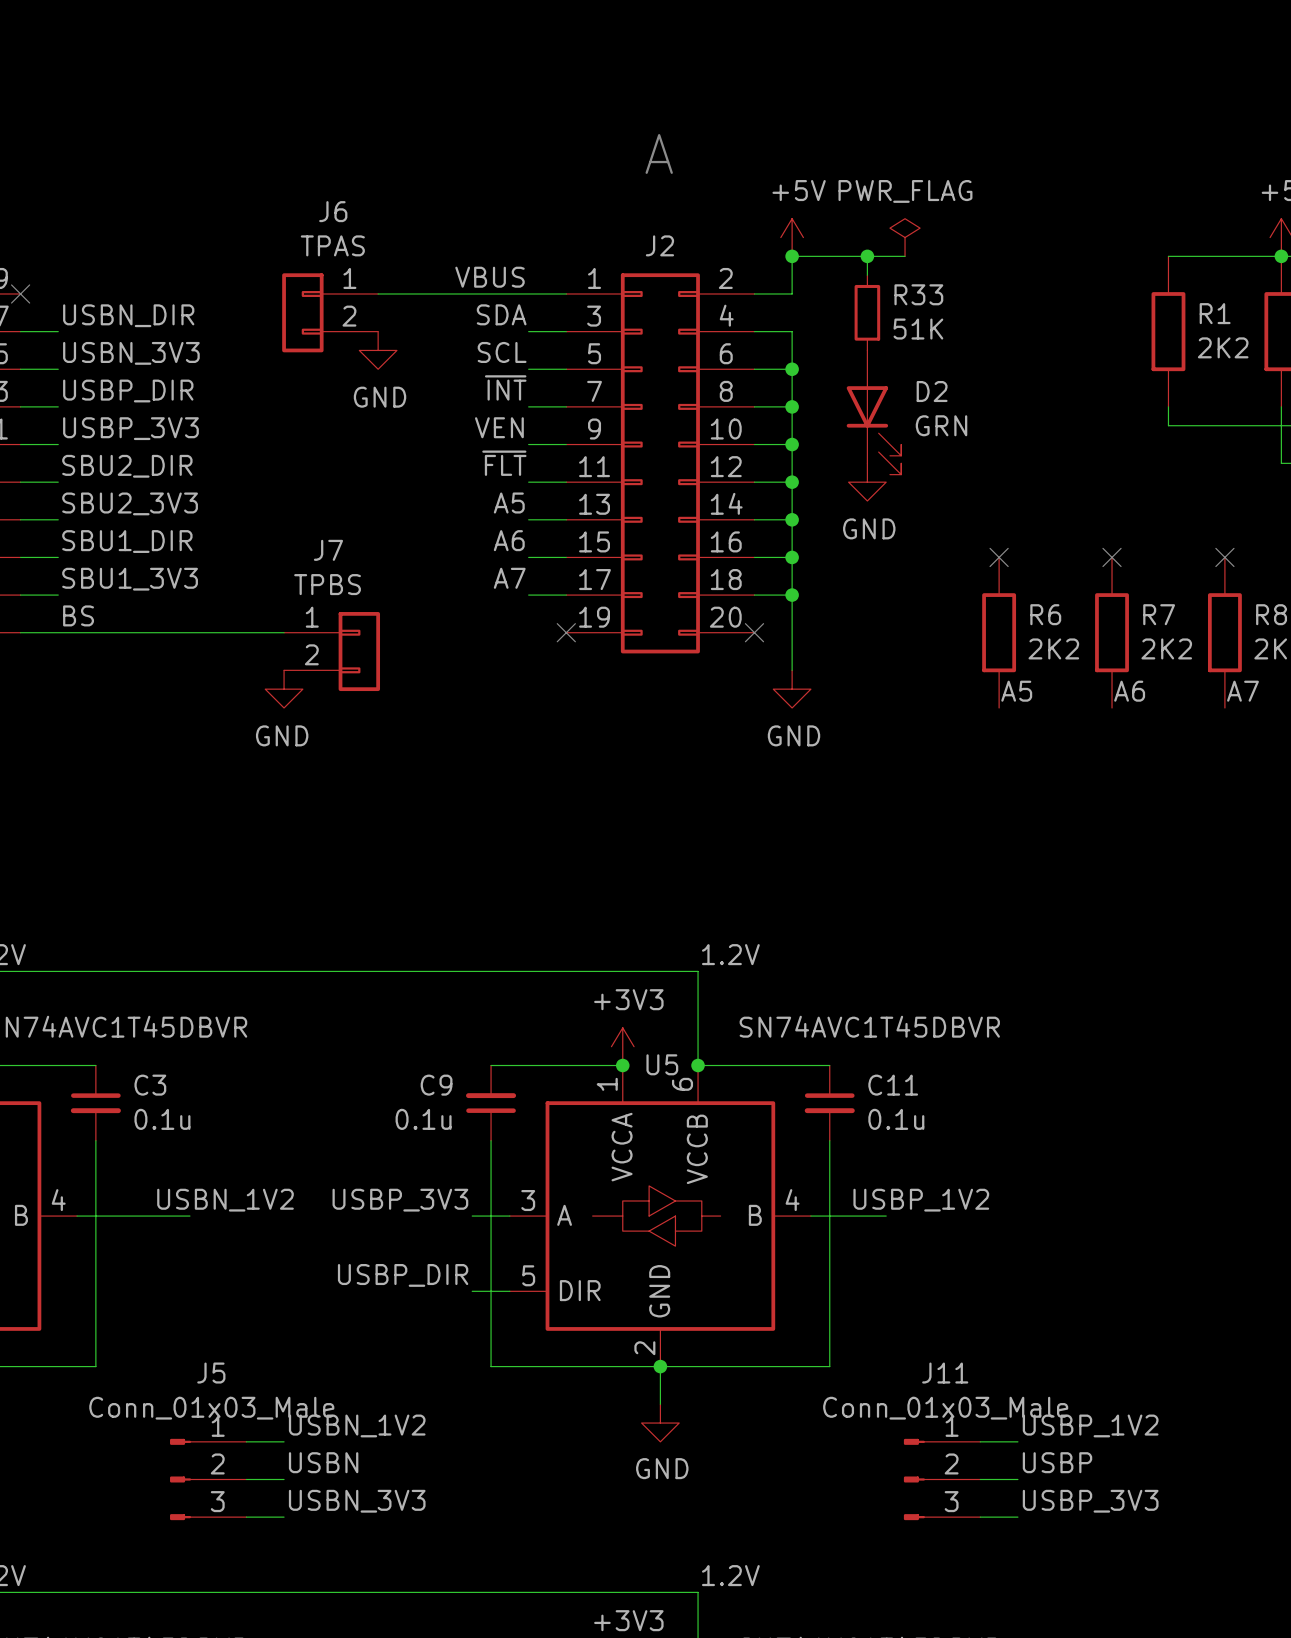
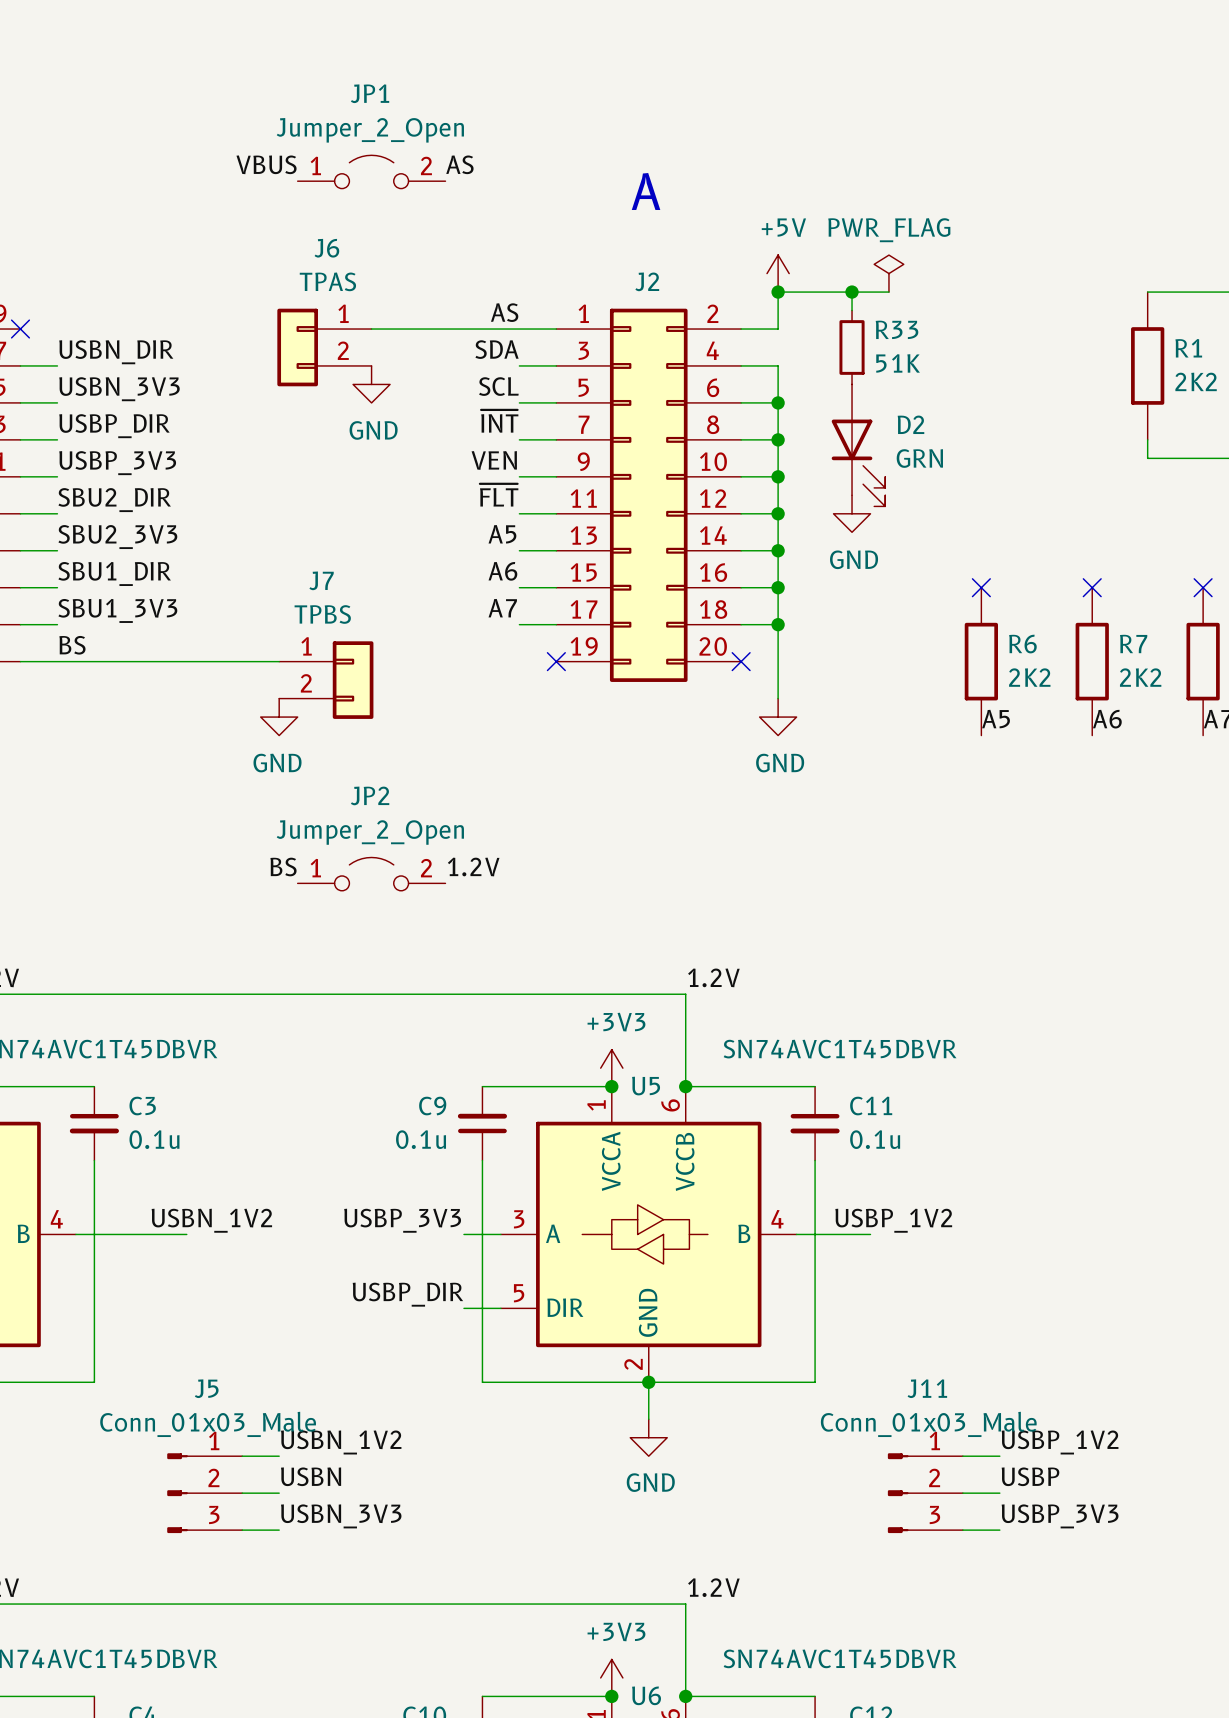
label: none -> VBUS (266, 164)
label: none -> AS (459, 164)
JP1: none -> Jumper_2_Open (371, 171)
label: VBUS (490, 277) -> AS (504, 312)
label: none -> BS (283, 867)
label: none -> 1.2V (473, 867)
JP2: none -> Jumper_2_Open (371, 874)

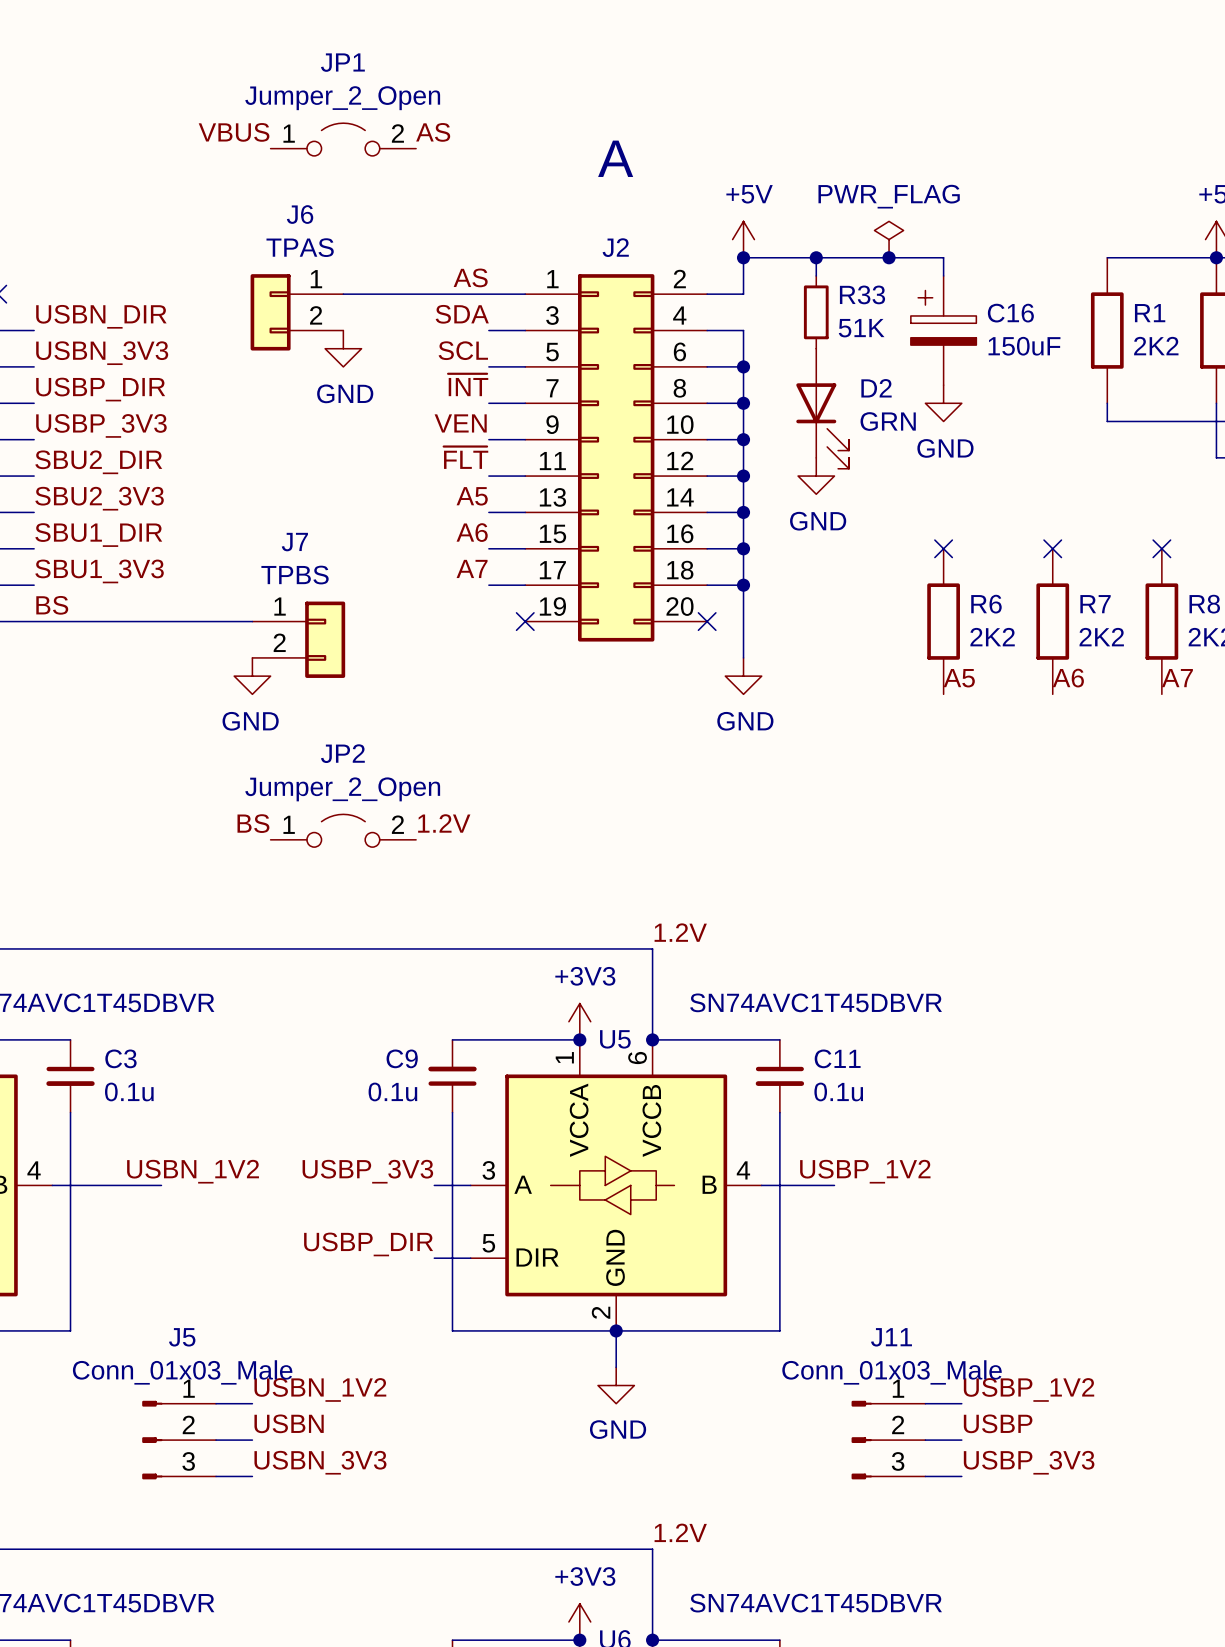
power symbol position: PWR_FLAG (888, 273) -> PWR_FLAG (889, 239)
wire: none -> (852, 257) (943, 257) (943, 275)
junction: none -> (889, 257)
C16: none -> 150uF (943, 330)
power symbol: none -> GND (943, 403)

